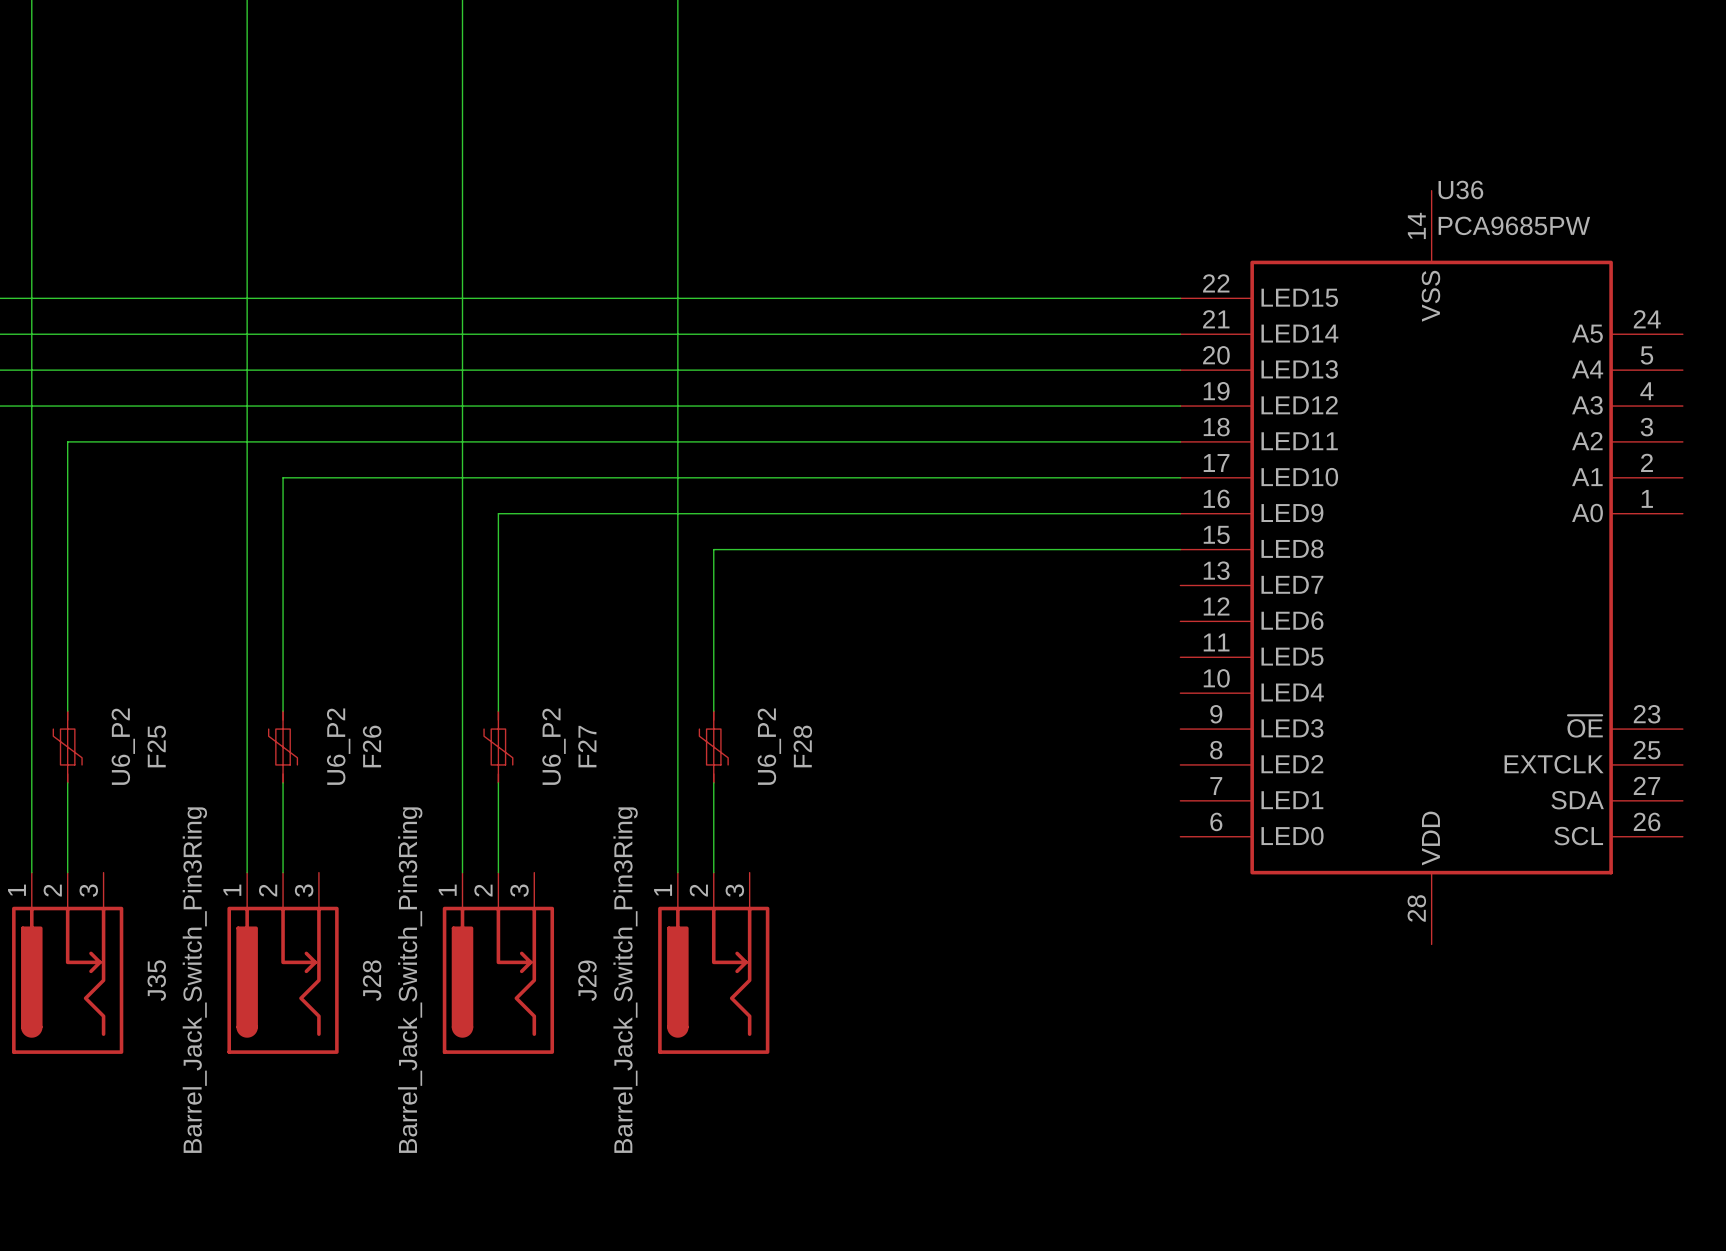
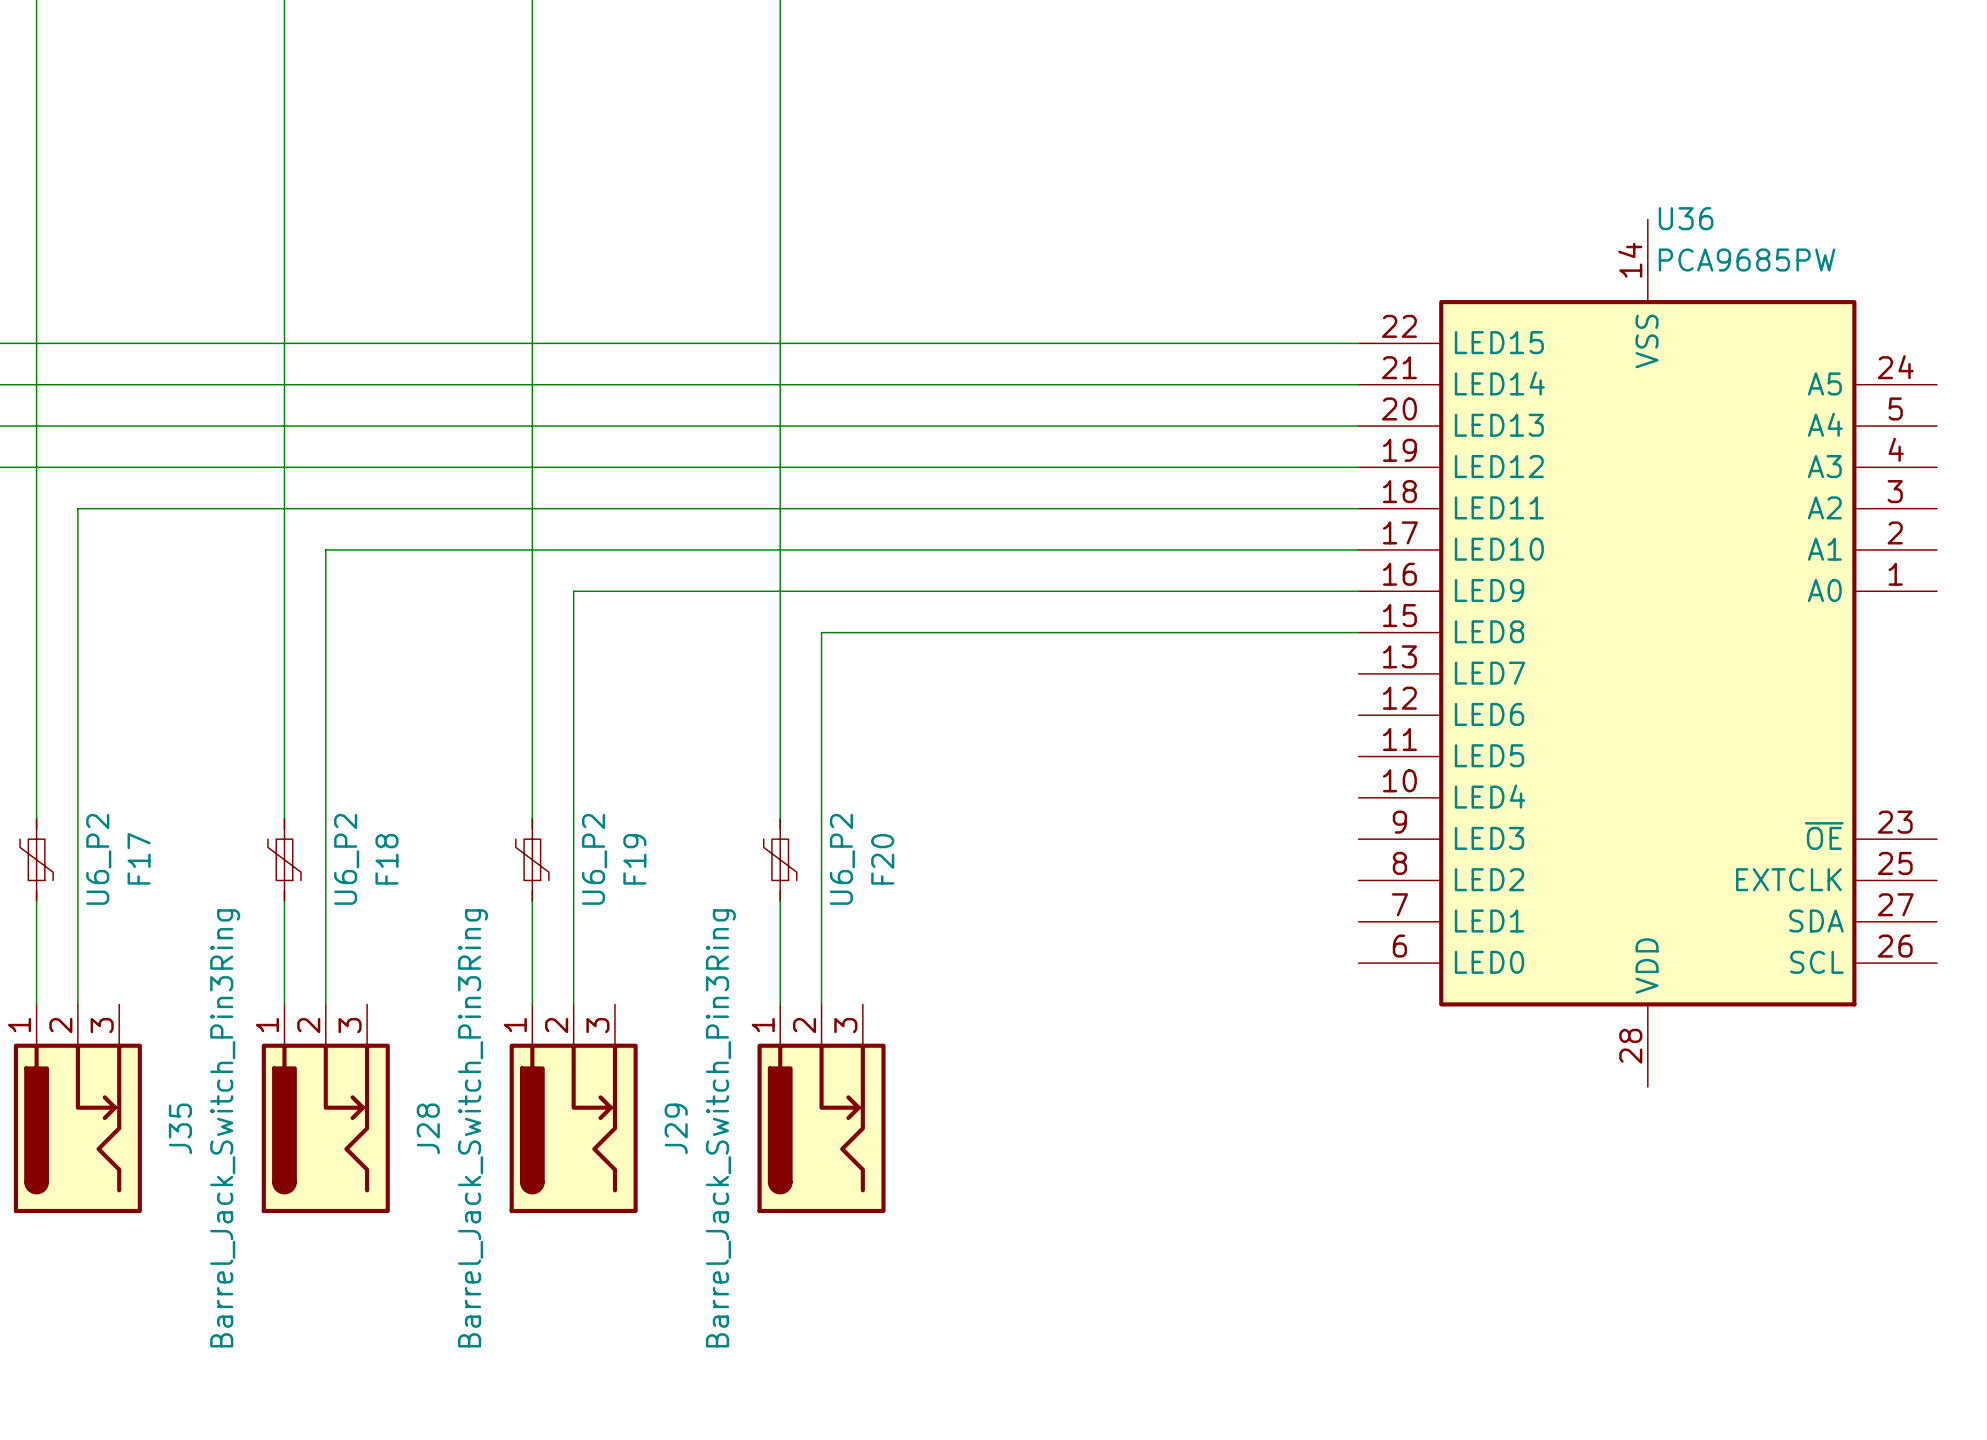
F17: none -> U6_P2 (36, 859)
F25: U6_P2 (67, 747) -> none
F18: none -> U6_P2 (284, 859)
F26: U6_P2 (283, 747) -> none
F19: none -> U6_P2 (532, 859)
F27: U6_P2 (498, 747) -> none
F20: none -> U6_P2 (780, 859)
F28: U6_P2 (713, 747) -> none

